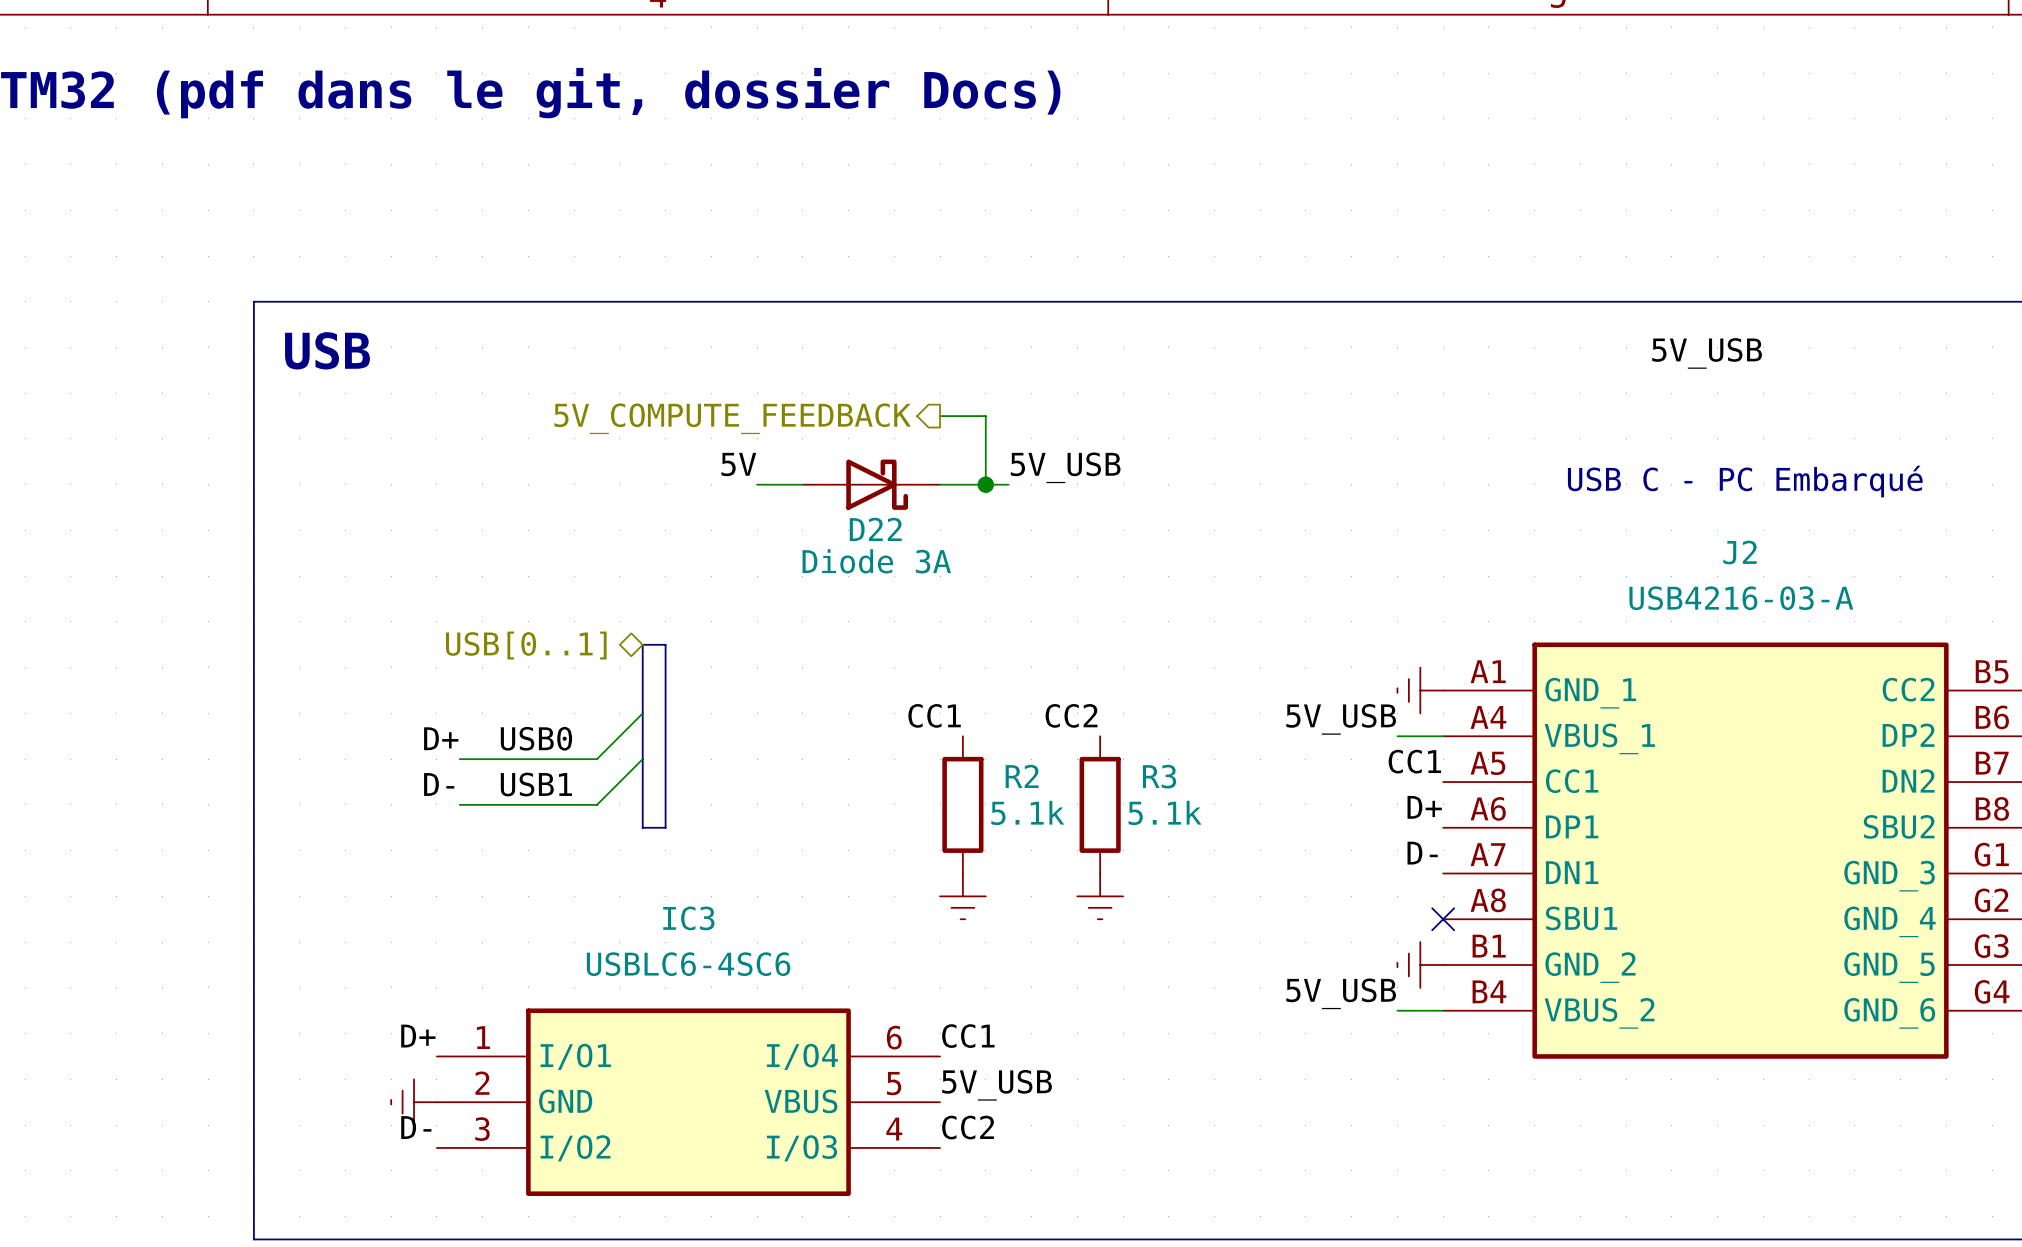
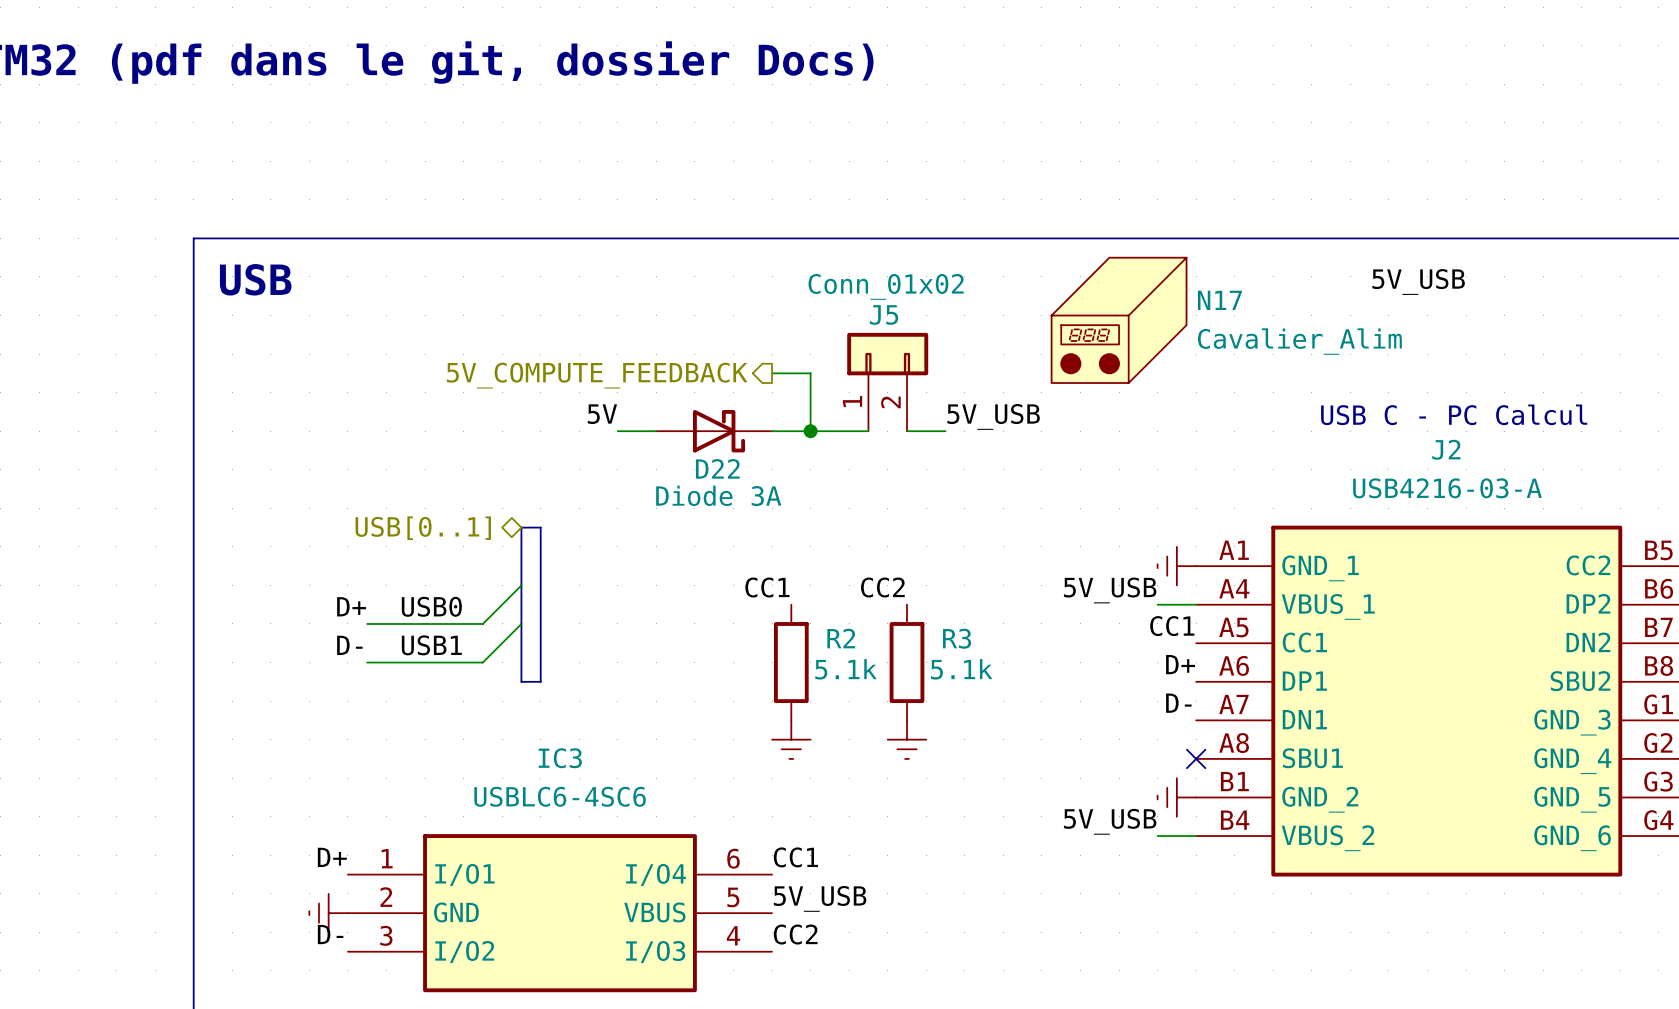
N17: none -> Cavalier_Alim (1119, 320)
wire: (940, 416) (985, 416) (985, 461) -> (772, 373) (810, 373)
hierarchical label position: 5V_COMPUTE_FEEDBACK (732, 418) -> 5V_COMPUTE_FEEDBACK (597, 375)
label position: 5V (738, 464) -> 5V (602, 414)
label position: 5V_USB (1065, 467) -> 5V_USB (993, 416)
J5: none -> Conn_01x02 (887, 382)
text: USB C - PC Embarqué (1745, 481) -> USB C - PC Calcul (1454, 414)
wire: (757, 484) (802, 484) -> (617, 431) (656, 431)
D22 position: (871, 484) -> (714, 431)
wire: (940, 484) (1008, 484) -> none
wire: none -> (810, 392) (810, 431)
junction position: (985, 484) -> (810, 431)
wire: none -> (772, 431) (868, 431)
wire: none -> (906, 431) (945, 431)

